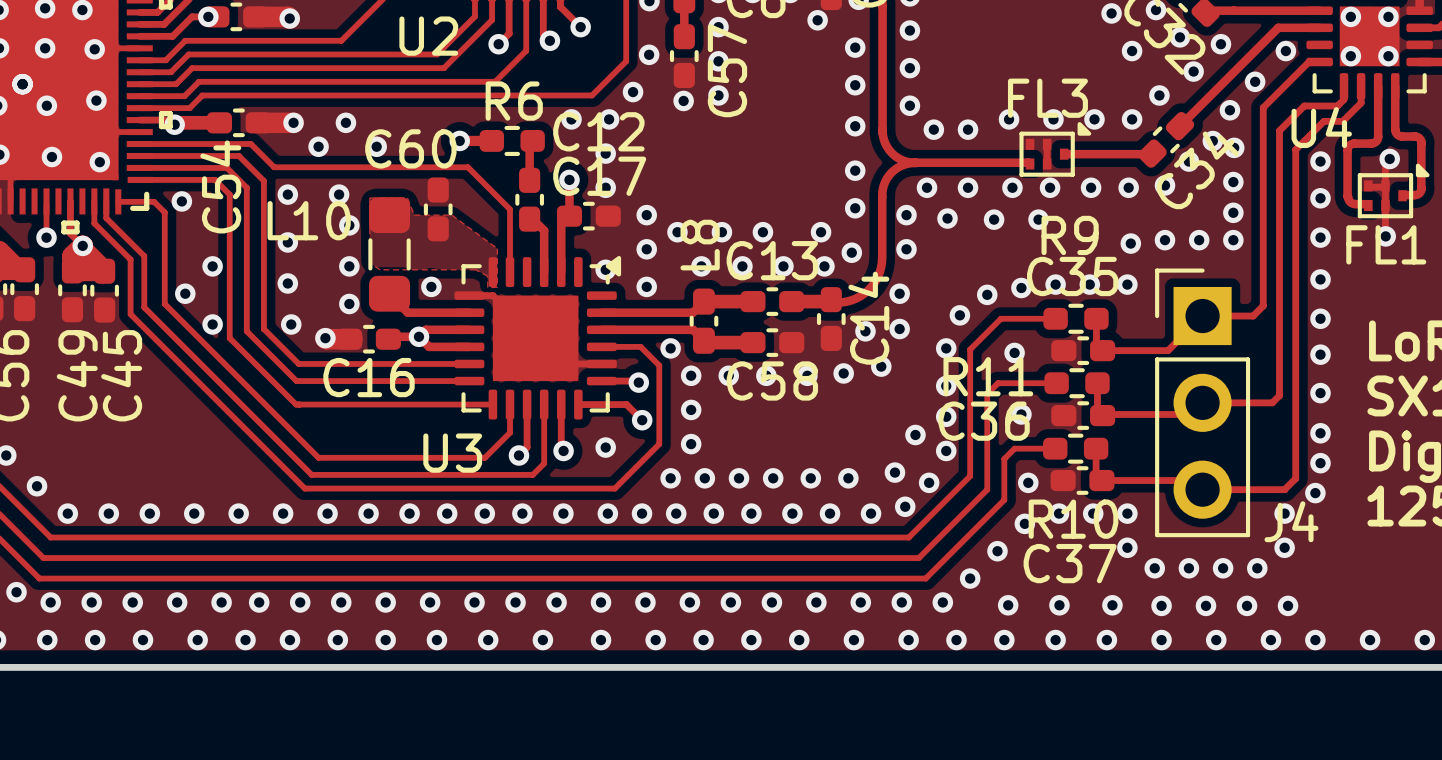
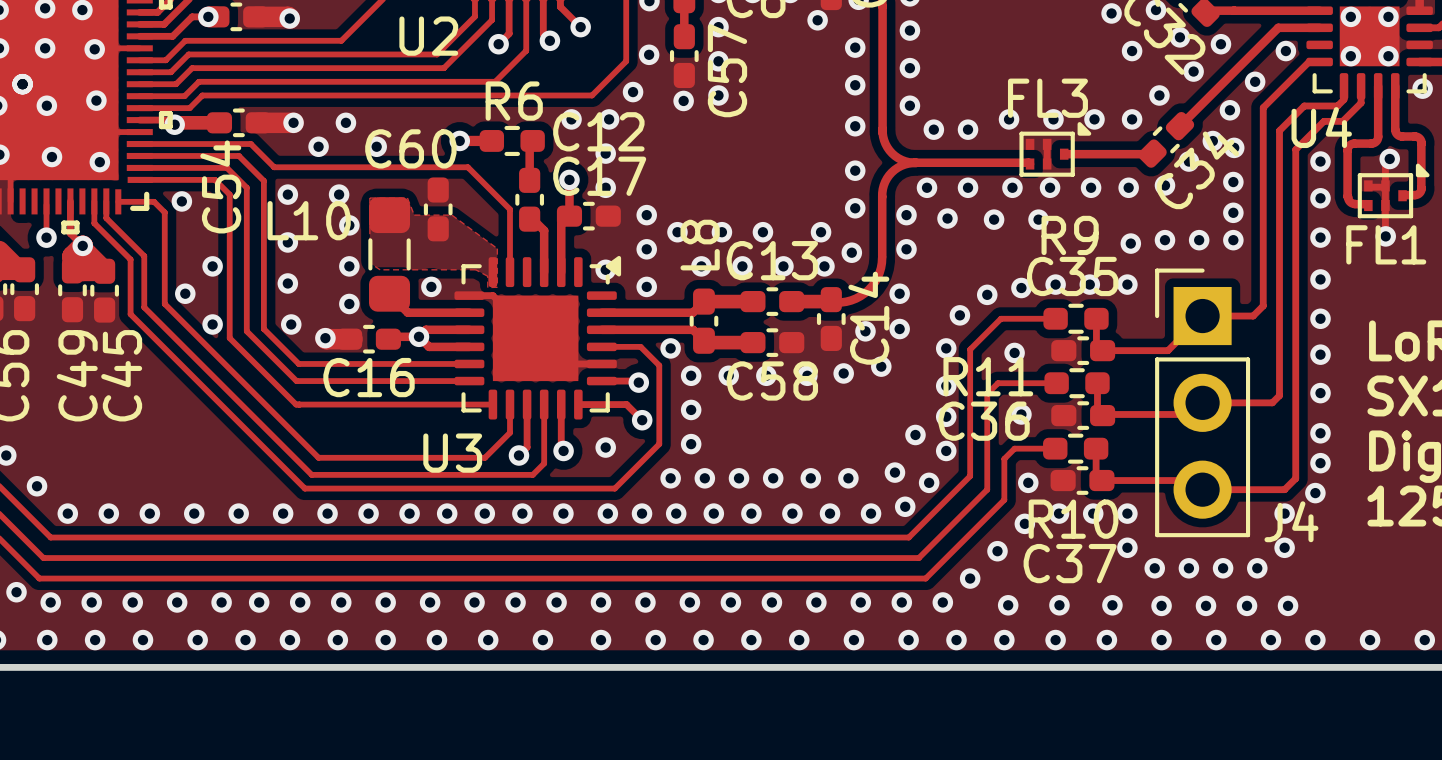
via: none -> (1422, 88)

